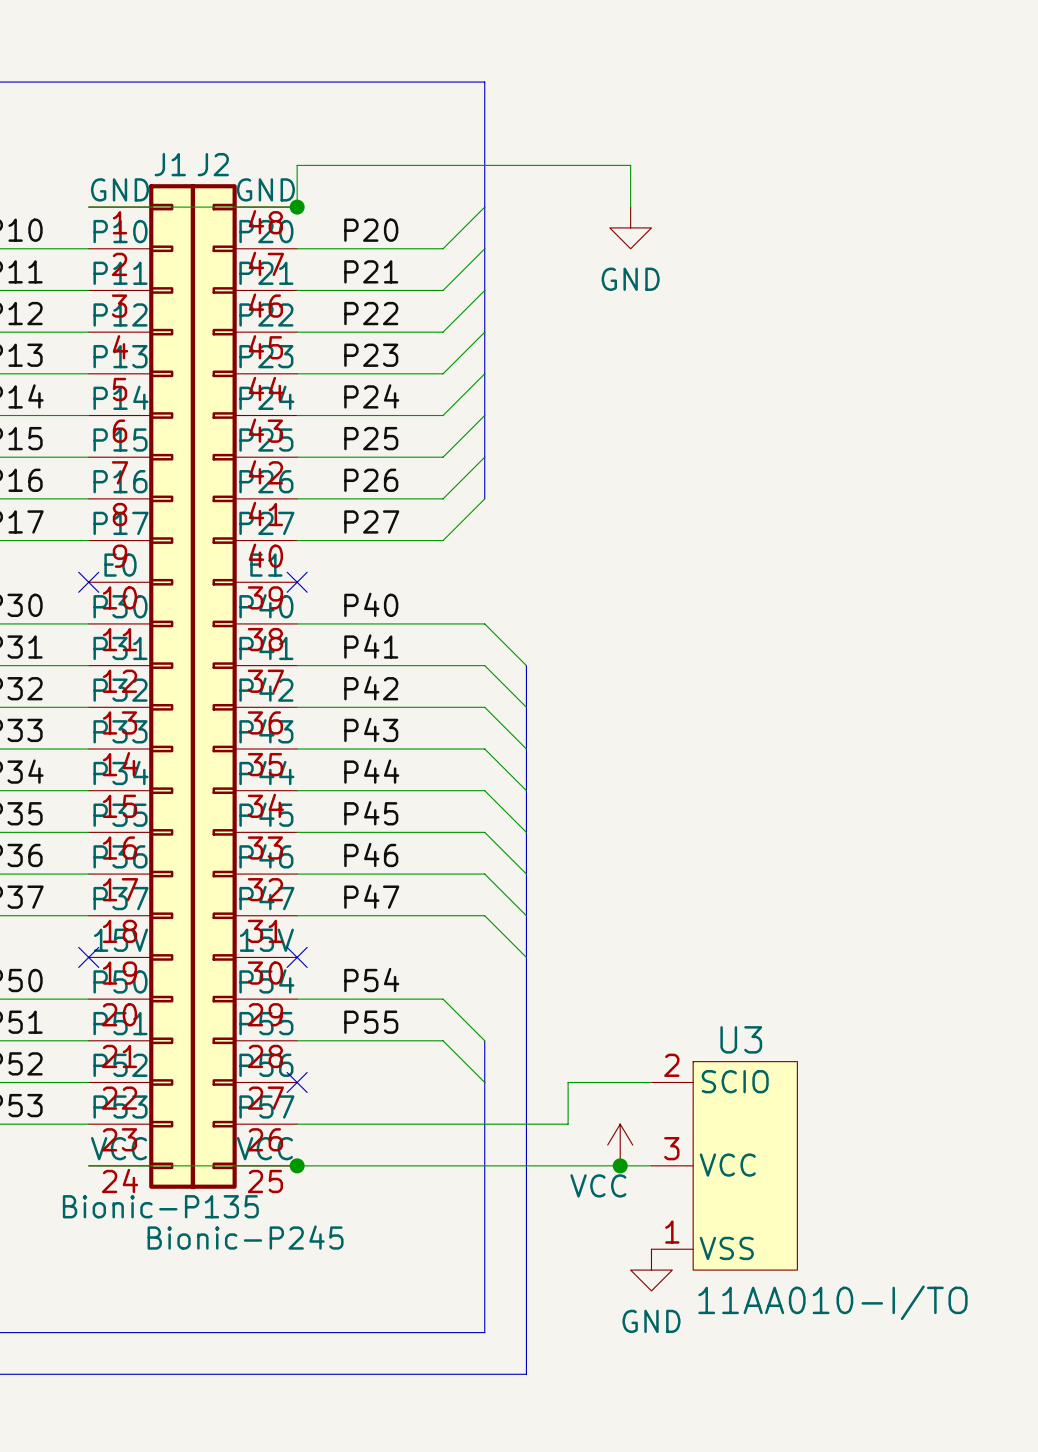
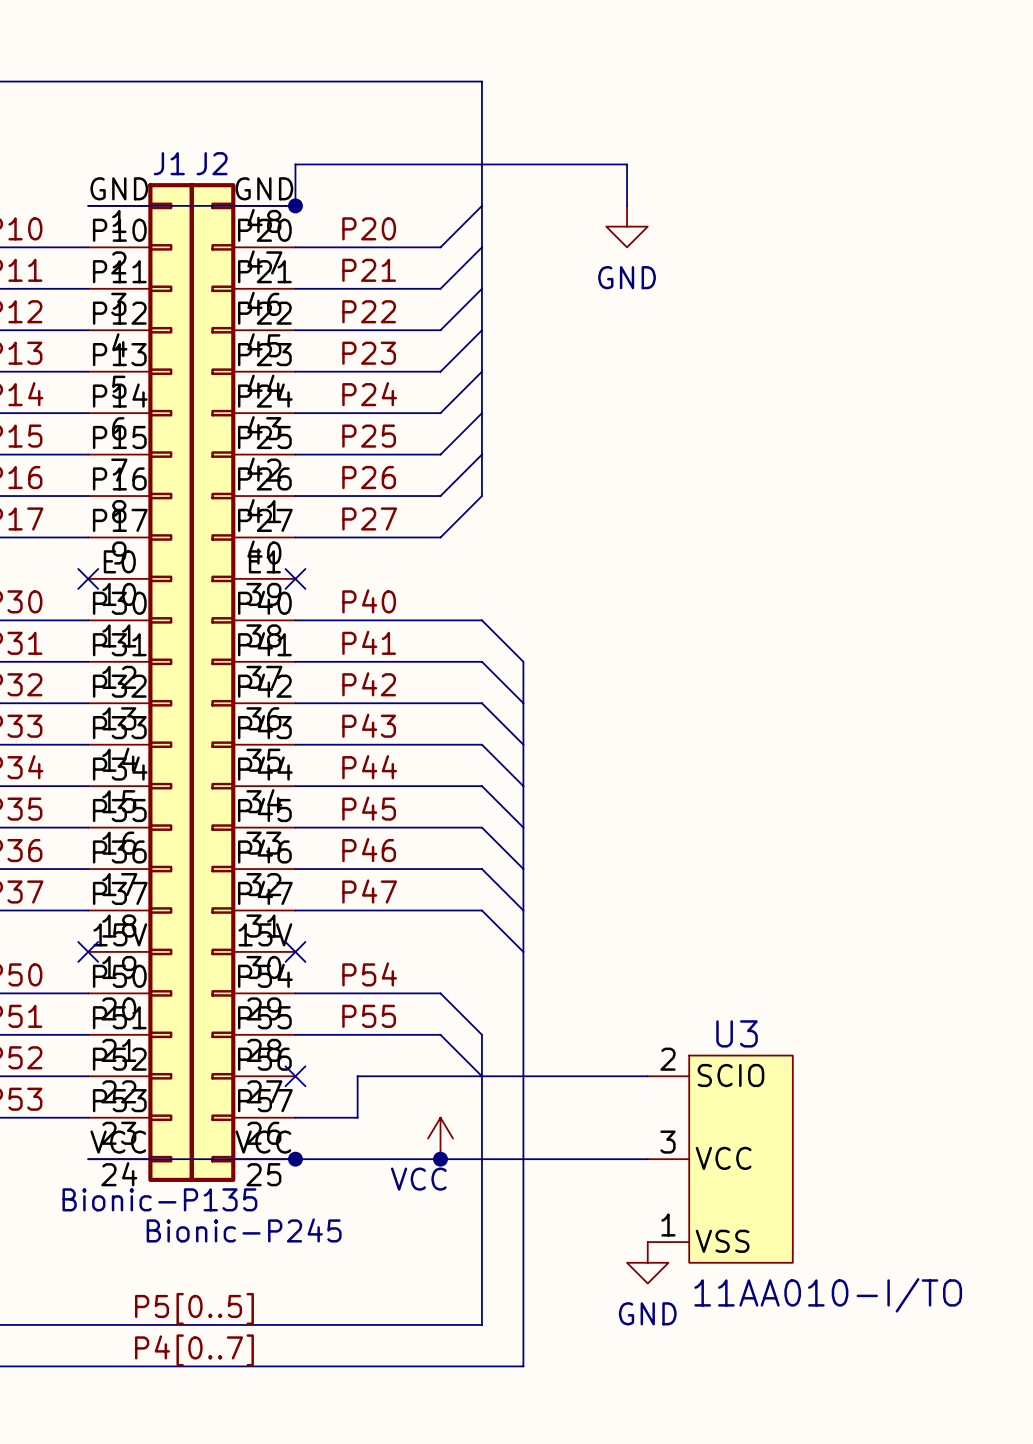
wire: (568, 1082) (568, 1124) (359, 1124) -> (564, 1076) (357, 1076) (357, 1117)
power symbol position: VCC (620, 1145) -> VCC (440, 1138)
junction: none -> (440, 1159)
junction: (620, 1165) -> none
label: none -> P5[0..5] (194, 1308)
label: none -> P4[0..7] (194, 1350)

